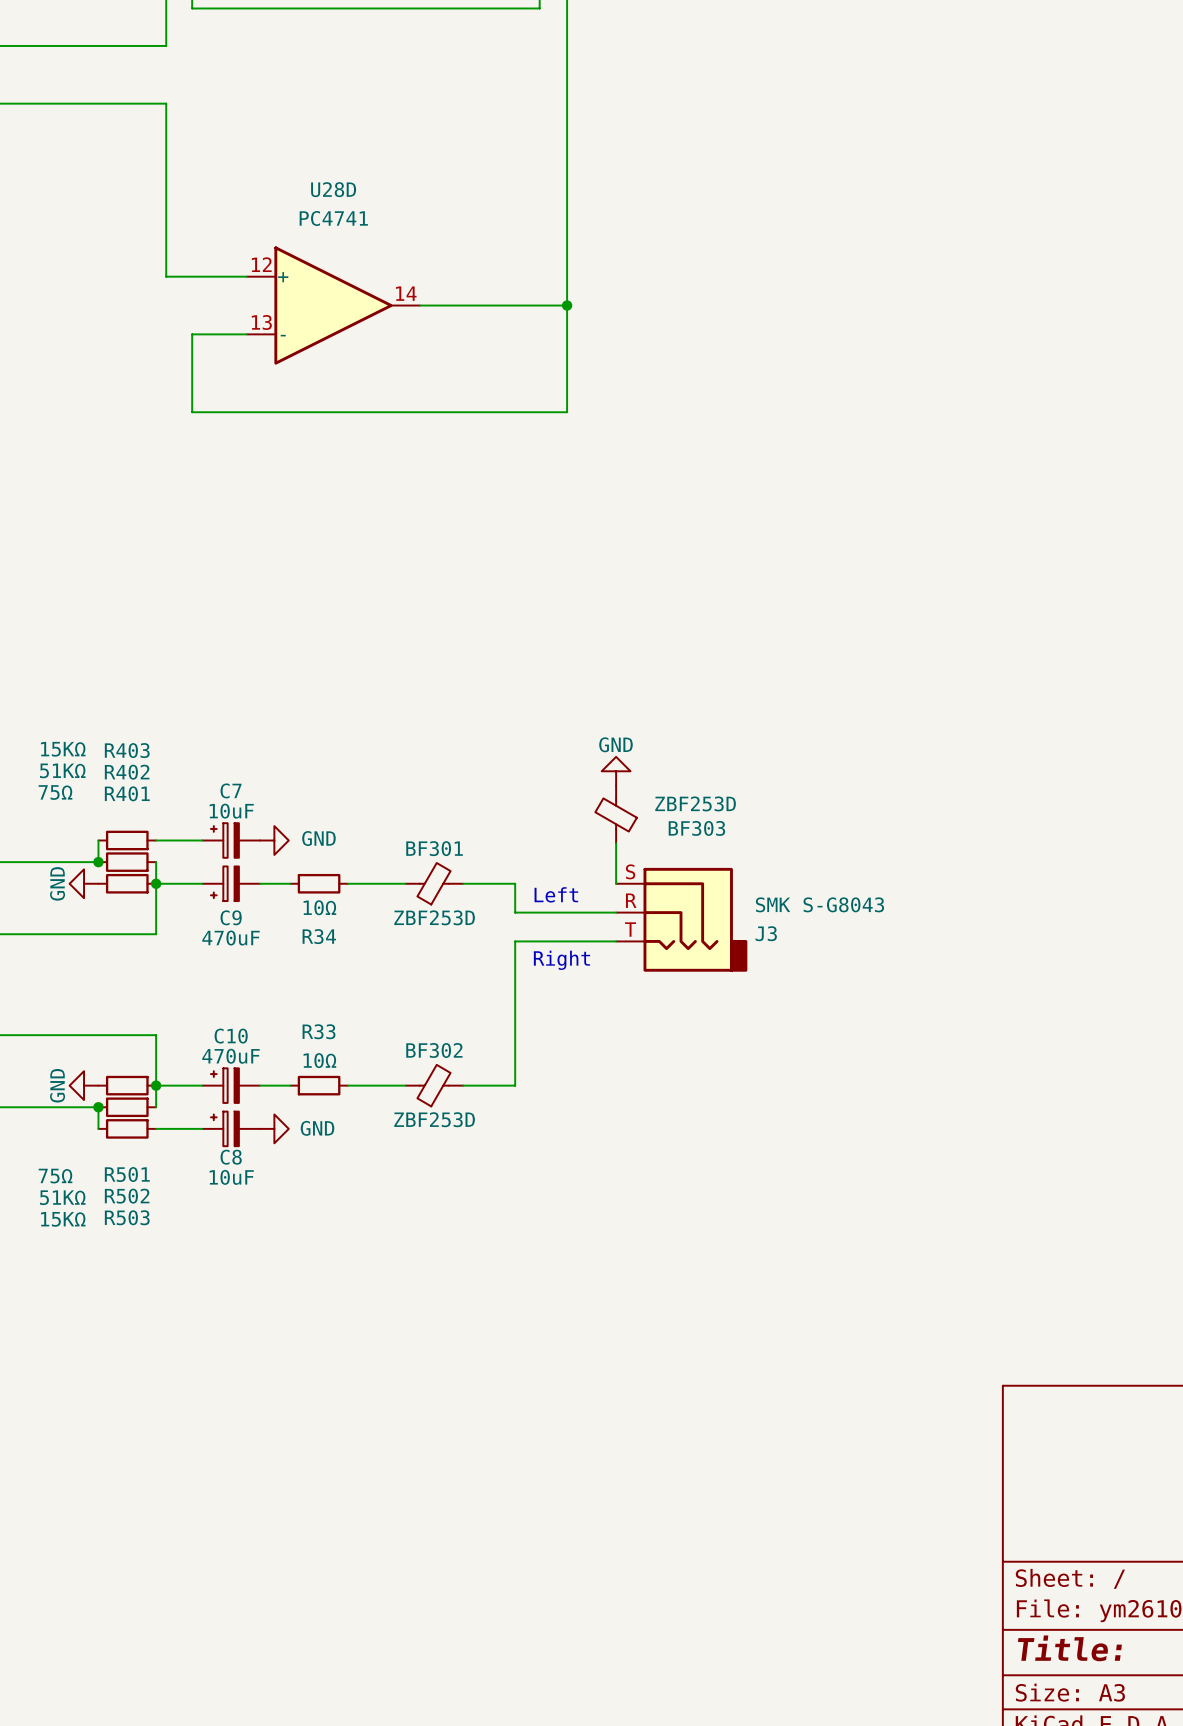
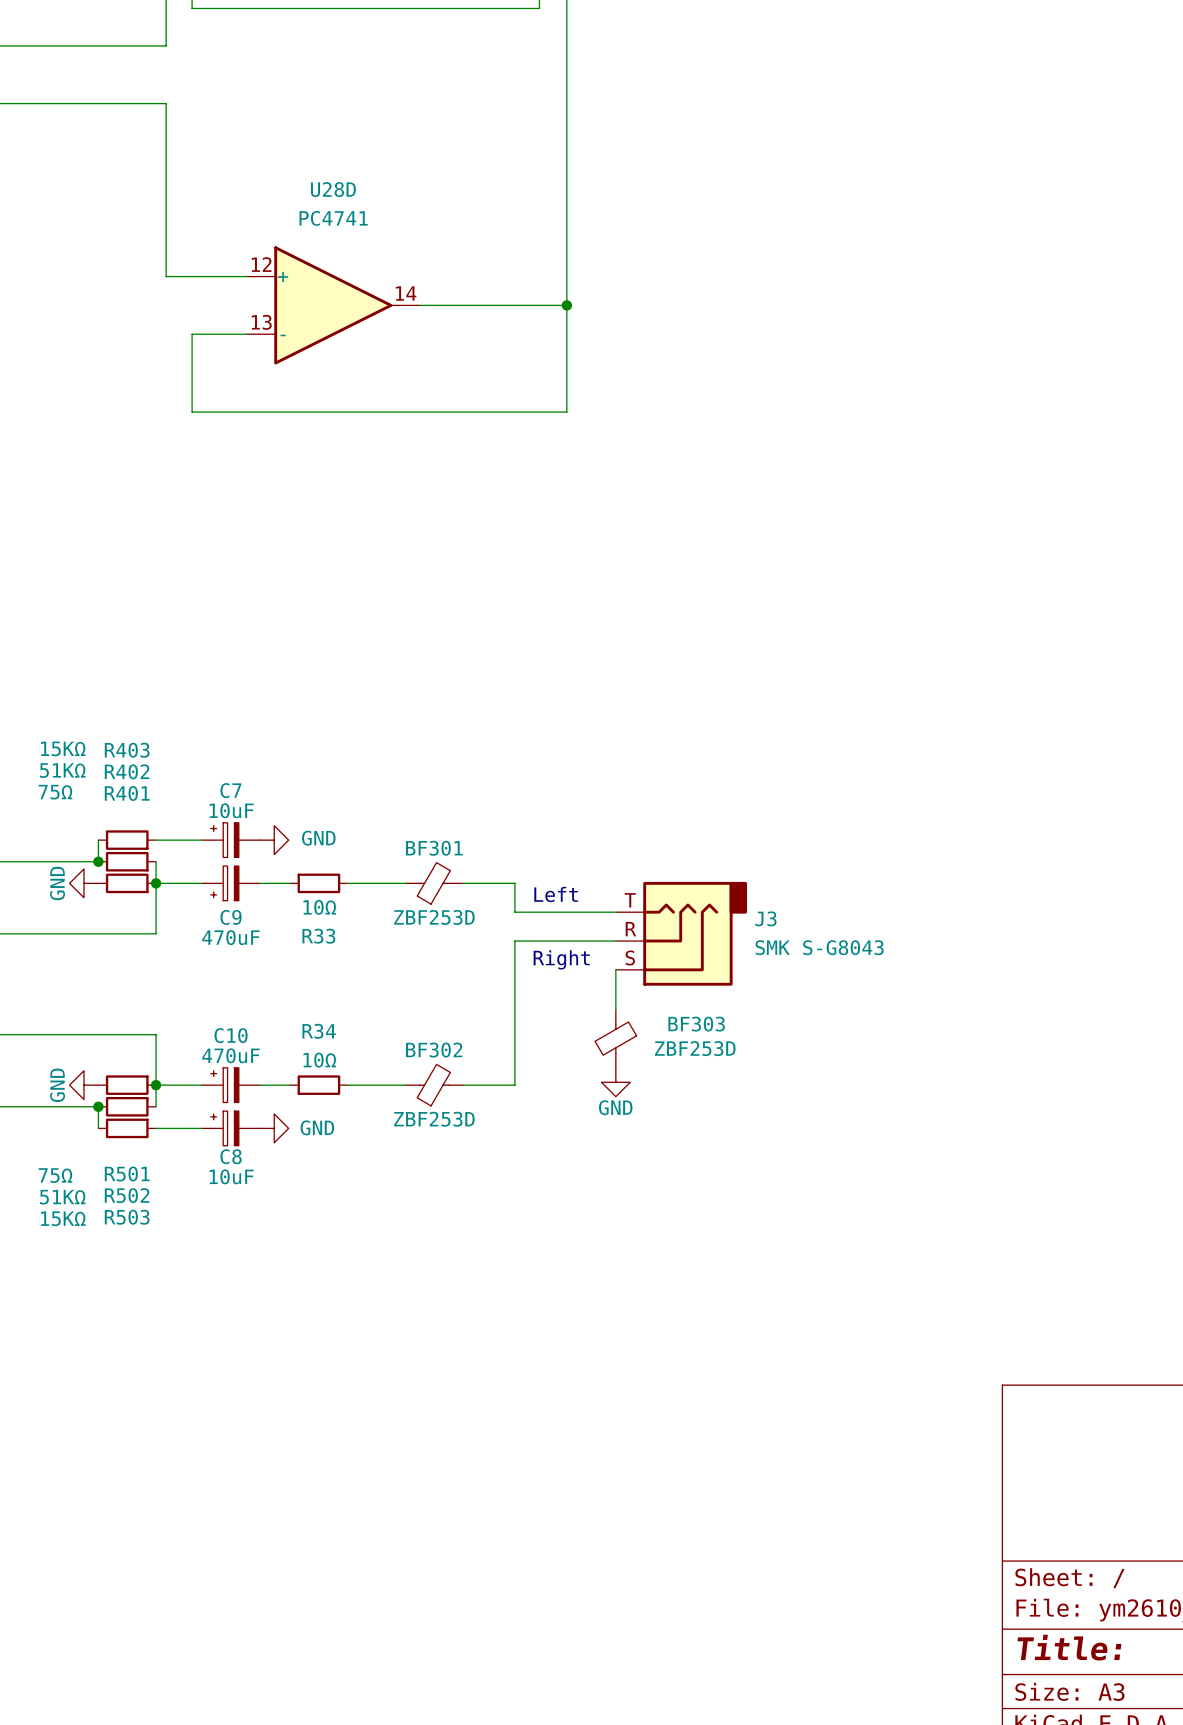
power symbol: GND (616, 771) -> none
BF303 flip: as is (616, 814) -> up-down (615, 1038)
BF303 position: (616, 814) -> (615, 1039)
wire: (616, 843) (616, 883) -> (615, 969) (615, 1010)
J3 flip: as is (695, 919) -> up-down (695, 933)
R34 name: R34 (319, 936) -> R33 (318, 936)
R33 name: R33 (319, 1031) -> R34 (319, 1031)
power symbol: none -> GND (615, 1082)

